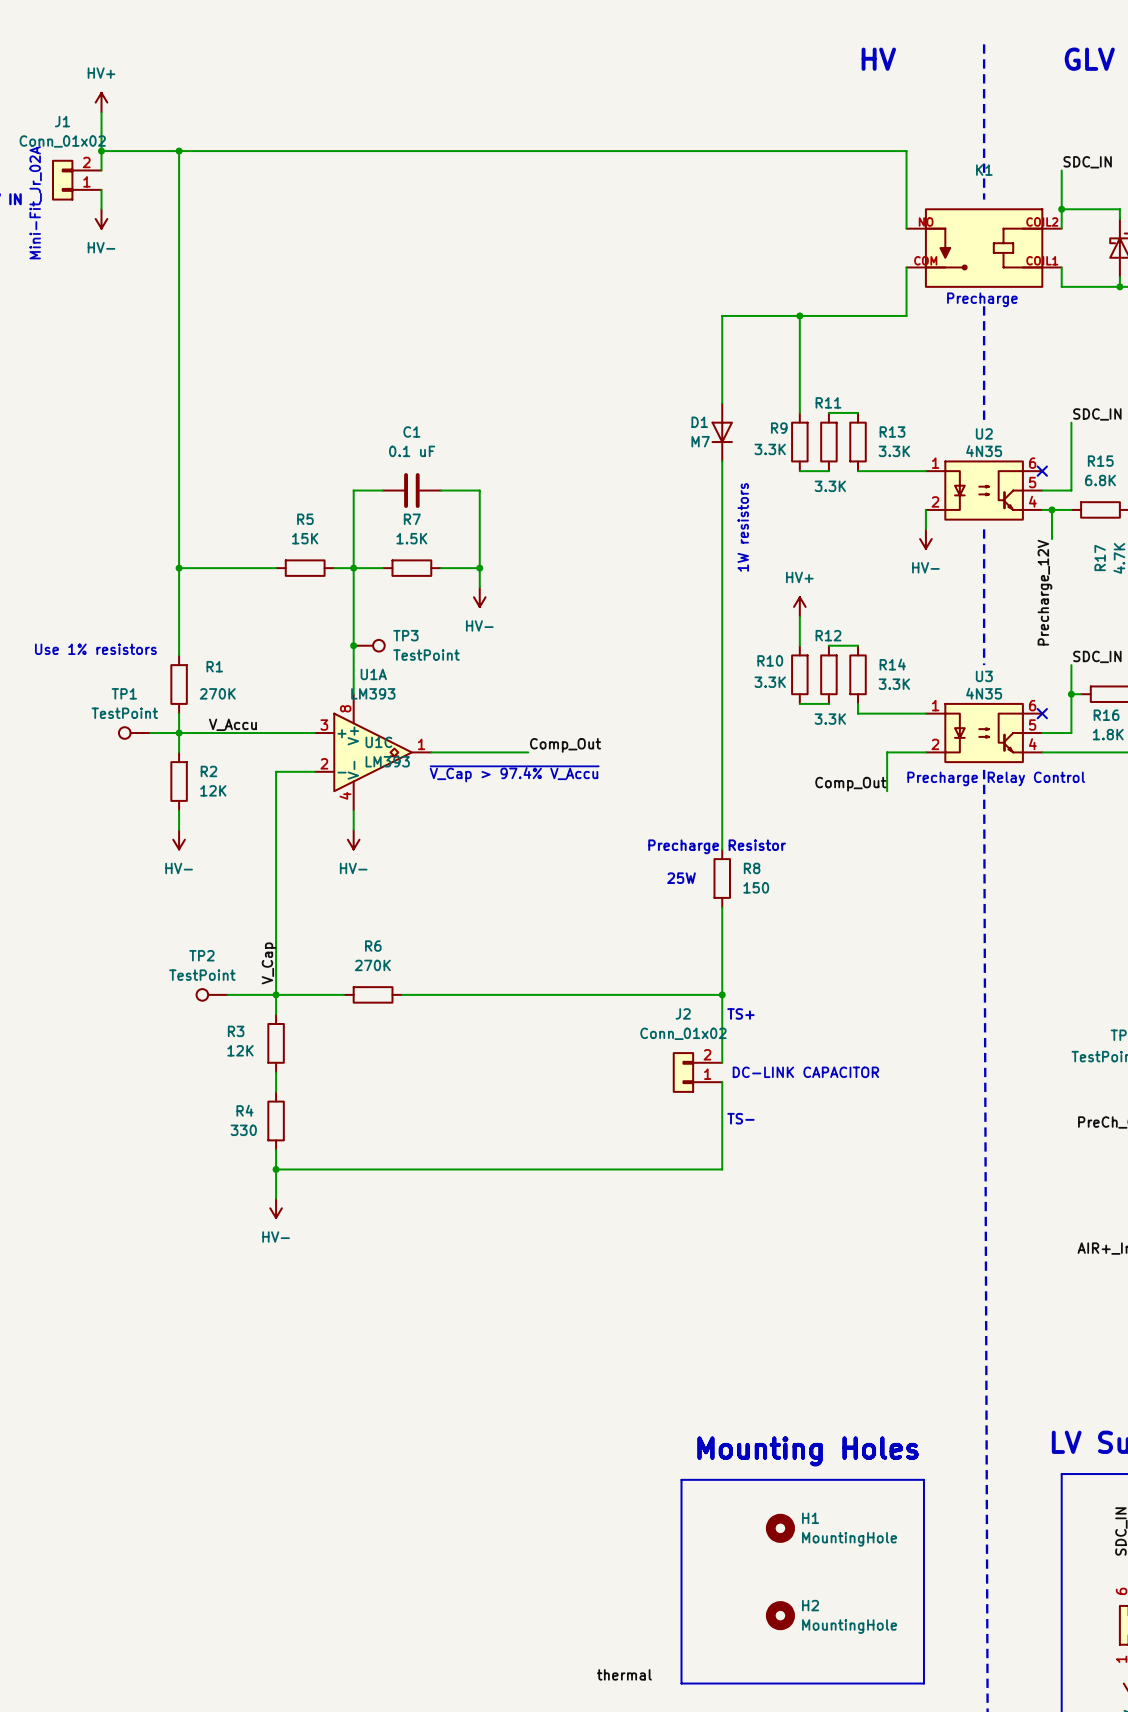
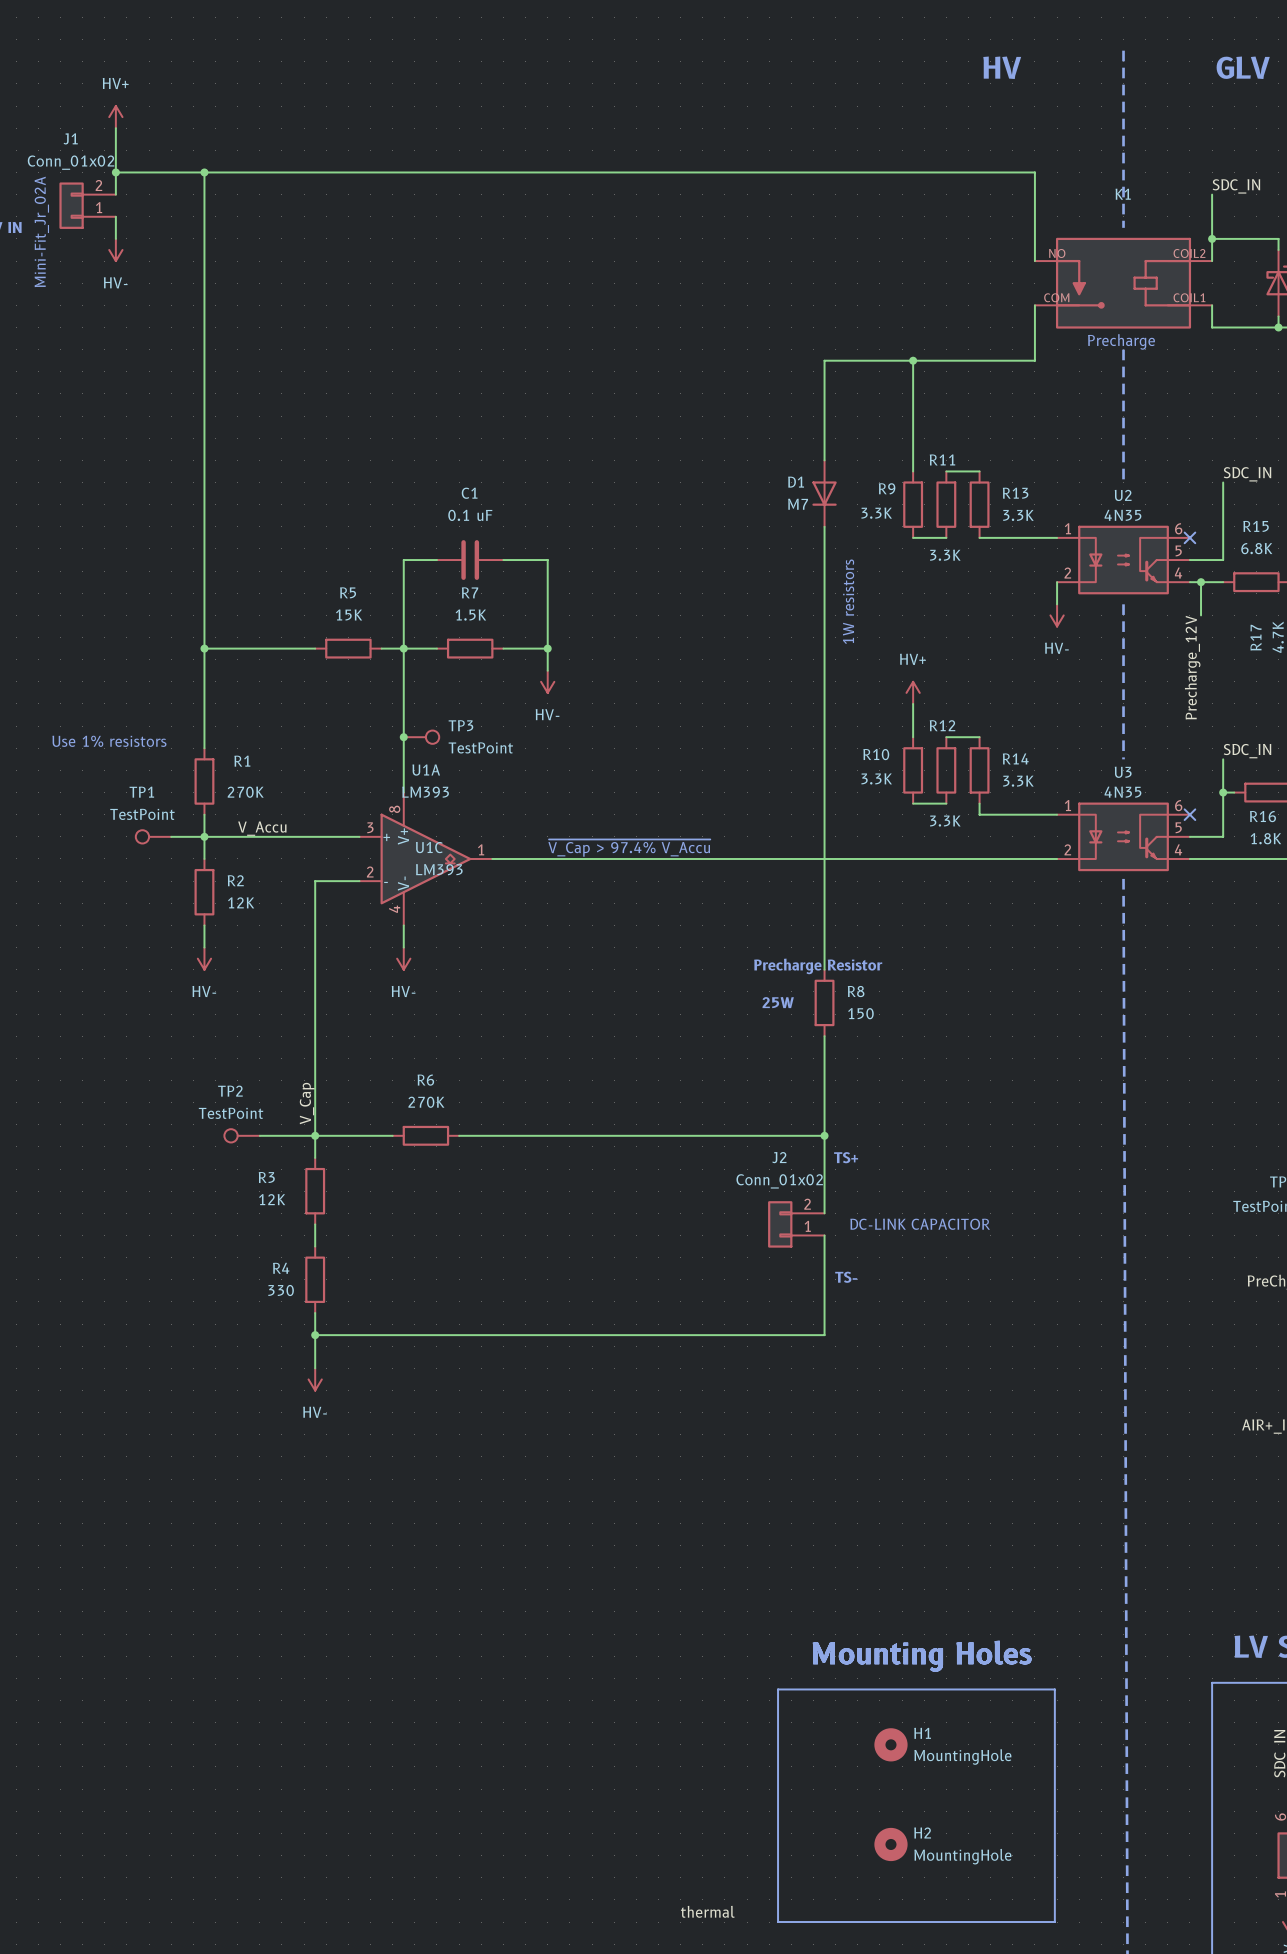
label: Comp_Out (565, 745) -> none
wire: (887, 752) (887, 791) -> (1012, 858) (603, 858)
text position: ~{V_Cap > 97.4% V_Accu} (514, 773) -> ~{V_Cap > 97.4% V_Accu} (629, 848)
text: Precharge Relay Control (996, 778) -> none
label: Comp_Out (850, 784) -> none

